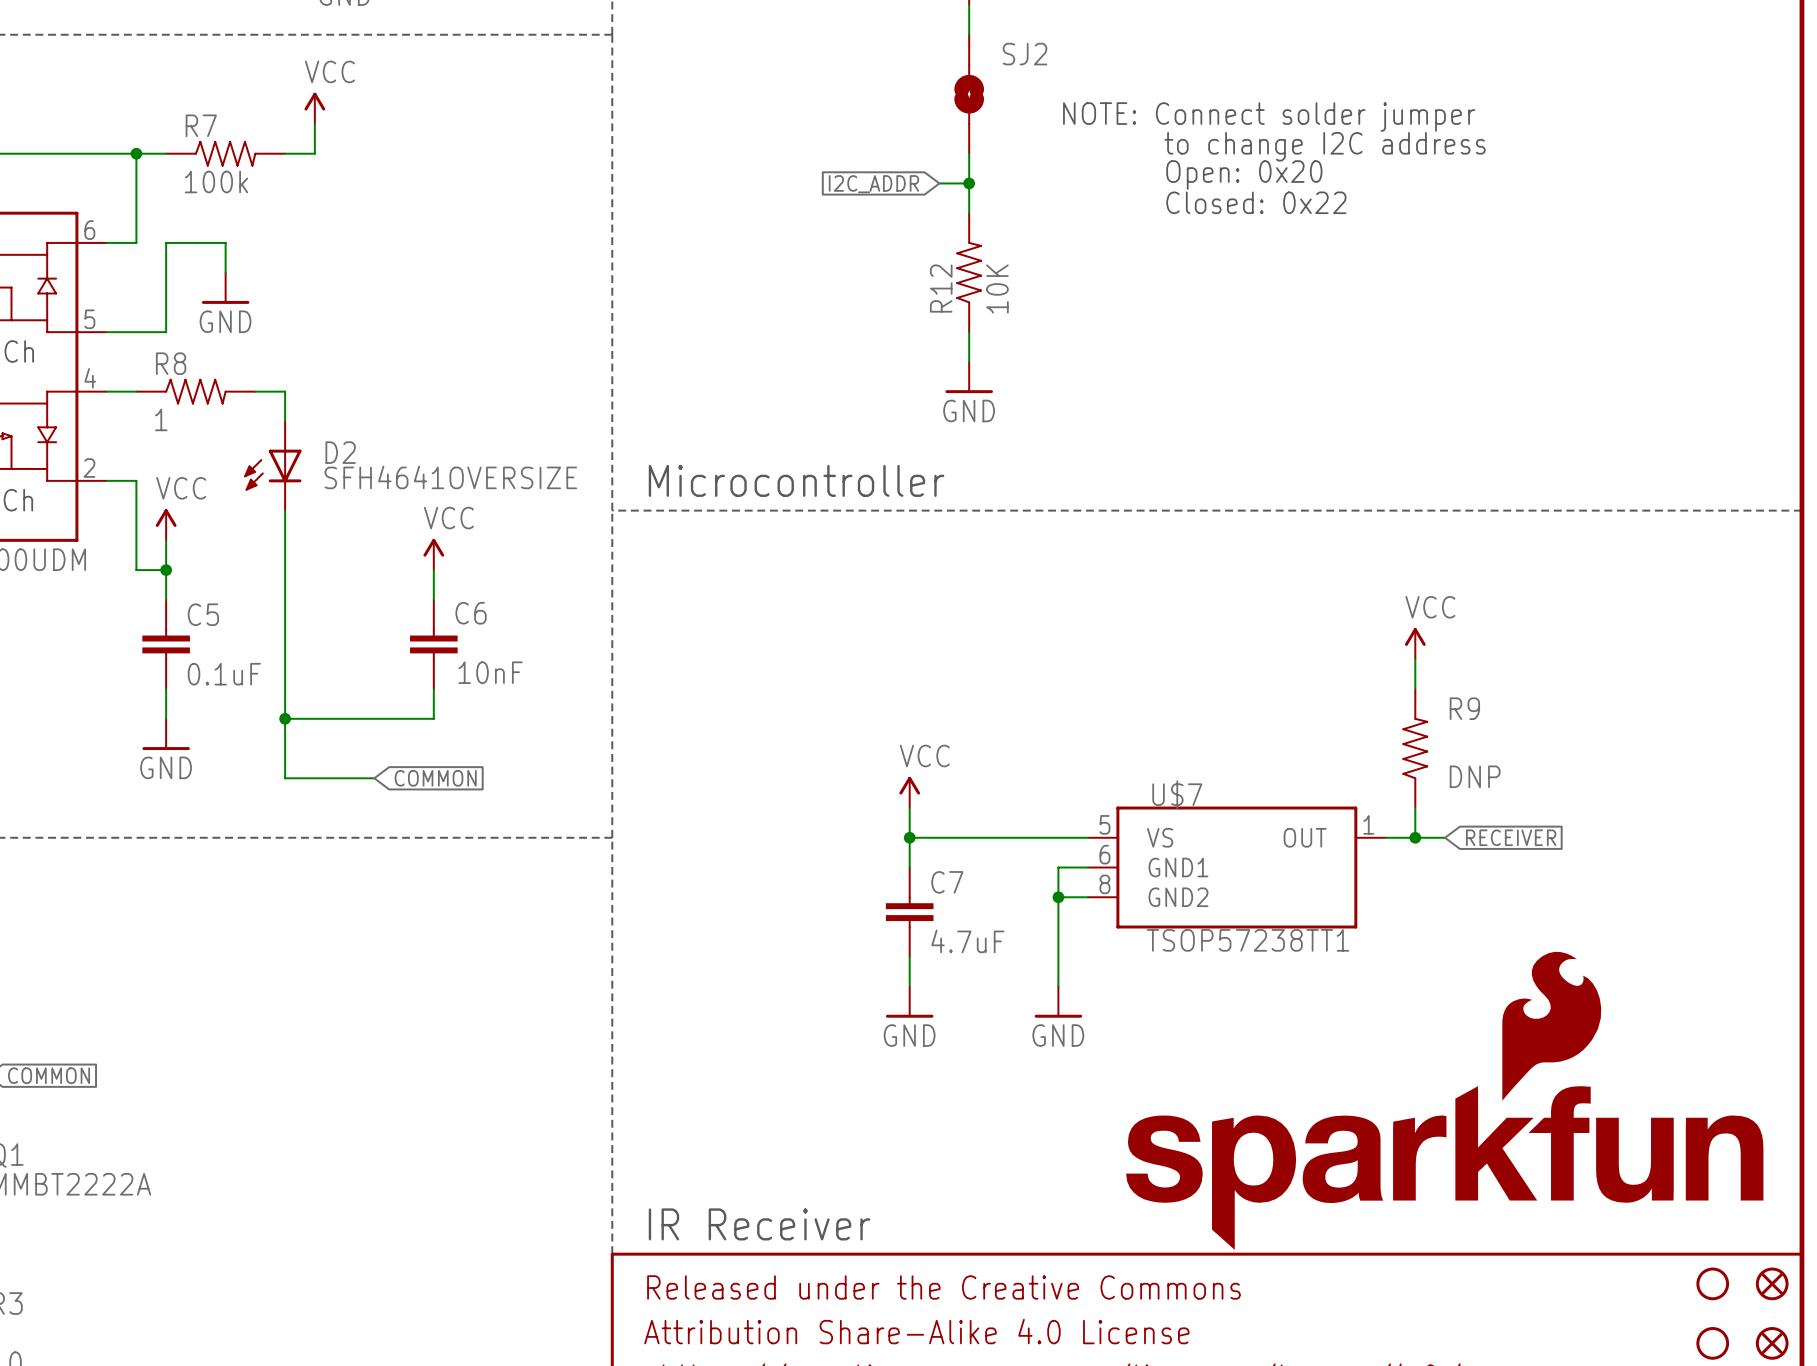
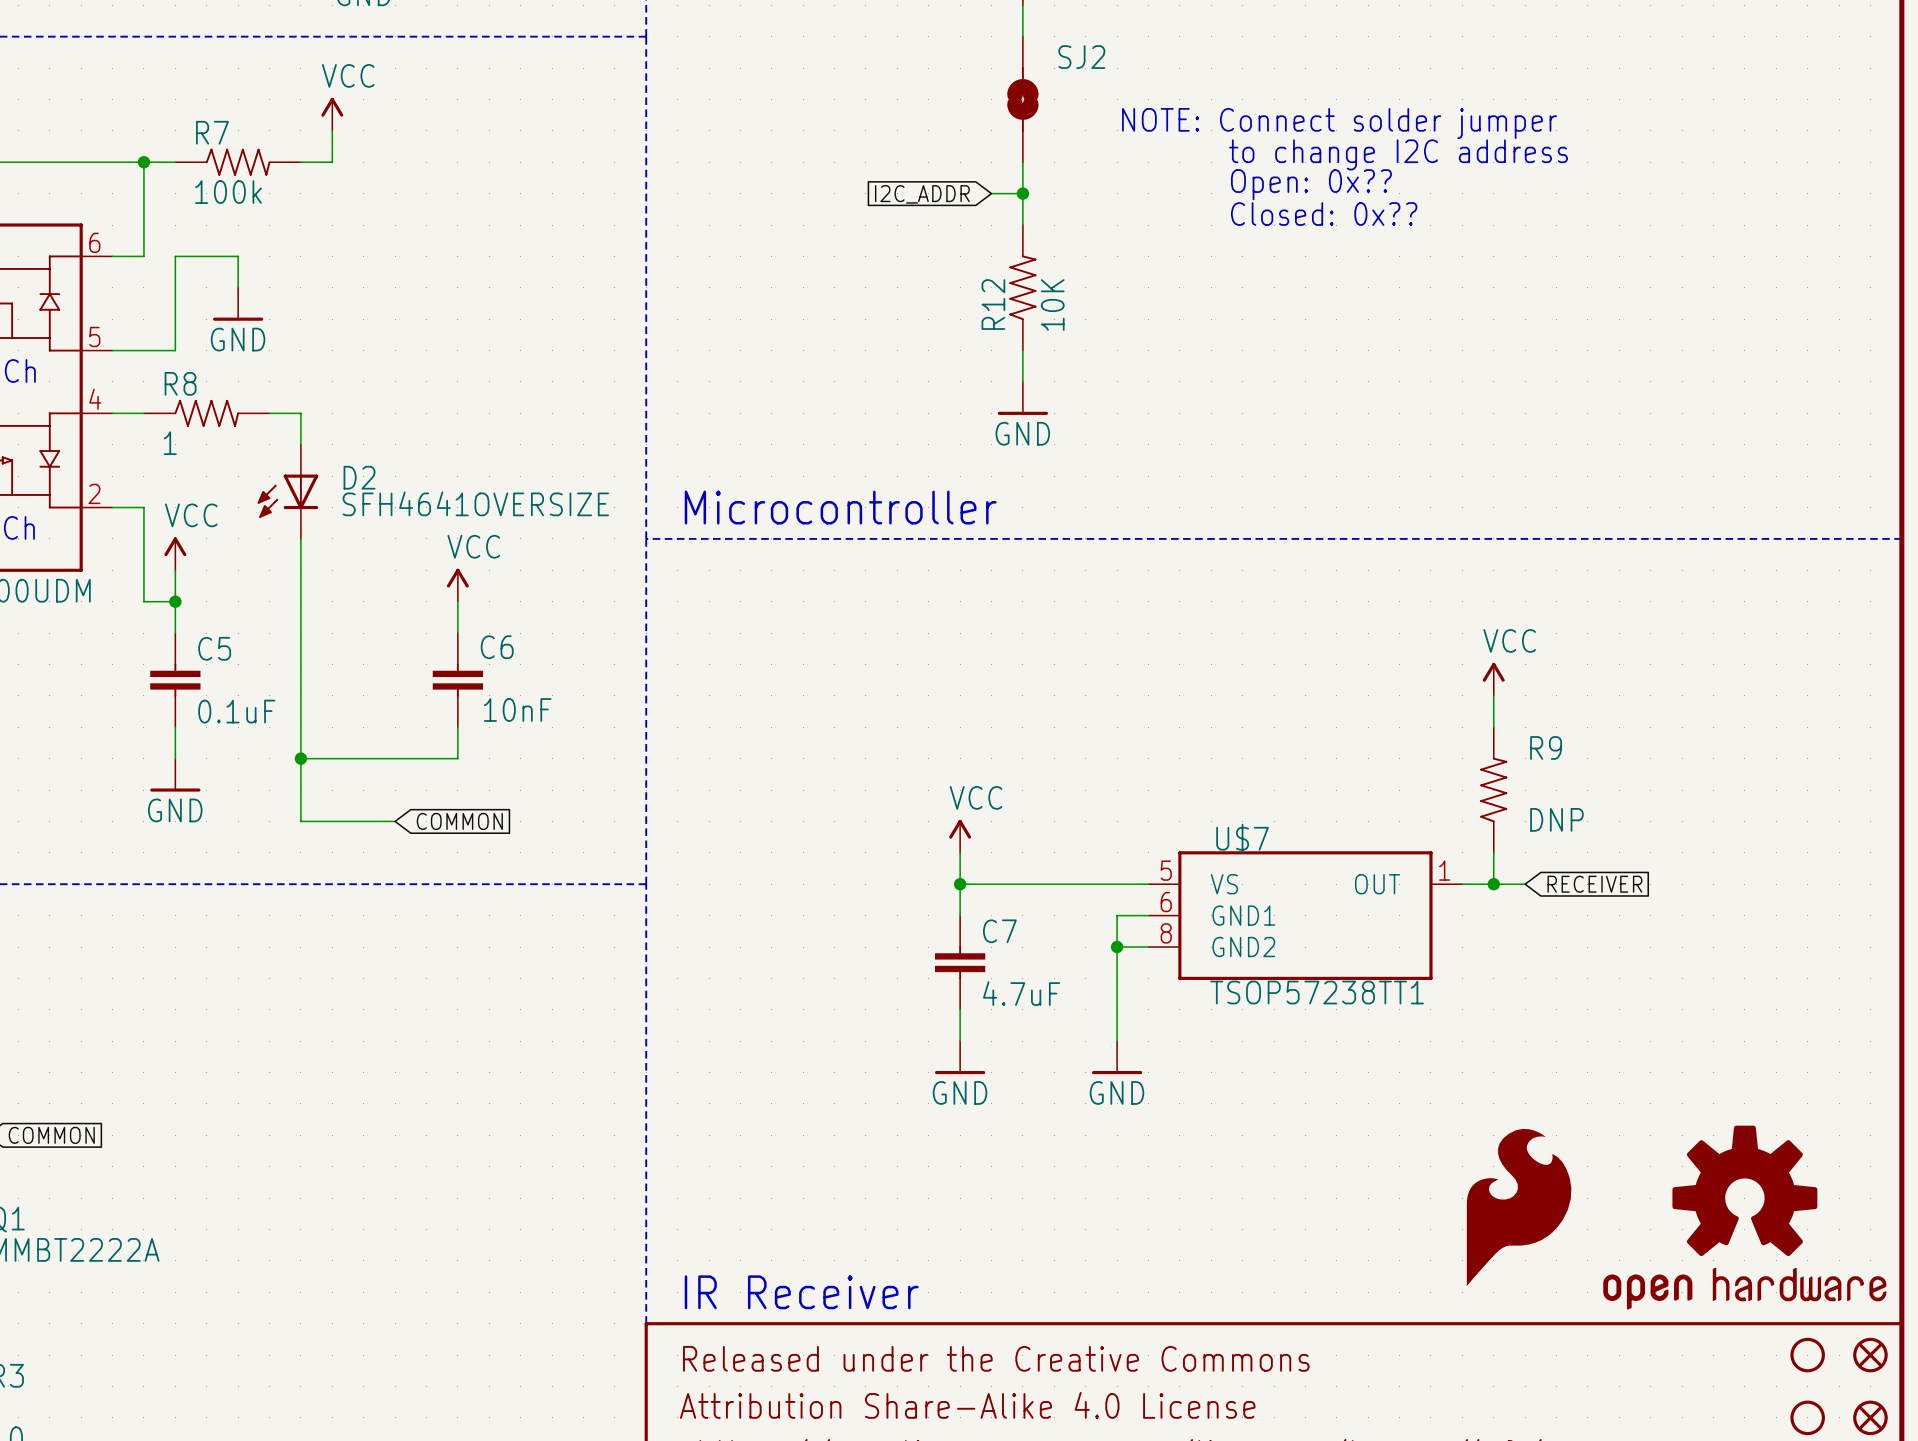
text: Open: 0x20 (1244, 175) -> Open: 0x?? (1311, 184)
text: Closed: 0x22 (1256, 202) -> Closed: 0x?? (1324, 214)
part: (1444, 1100) -> none
part: none -> (1519, 1207)
part: none -> (1744, 1217)

